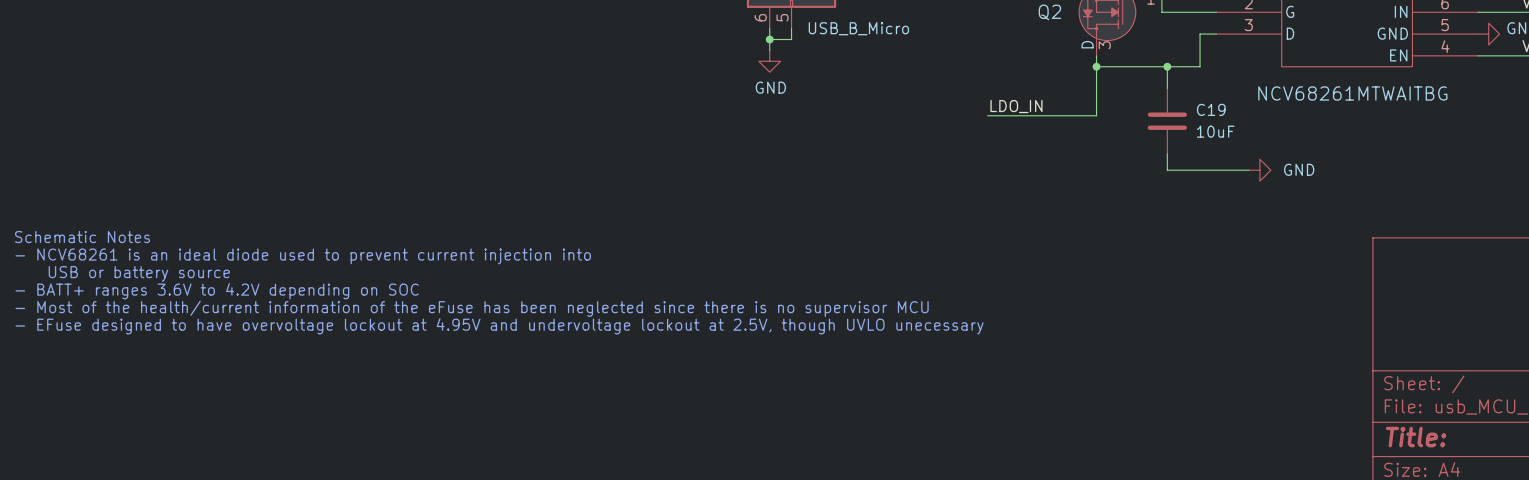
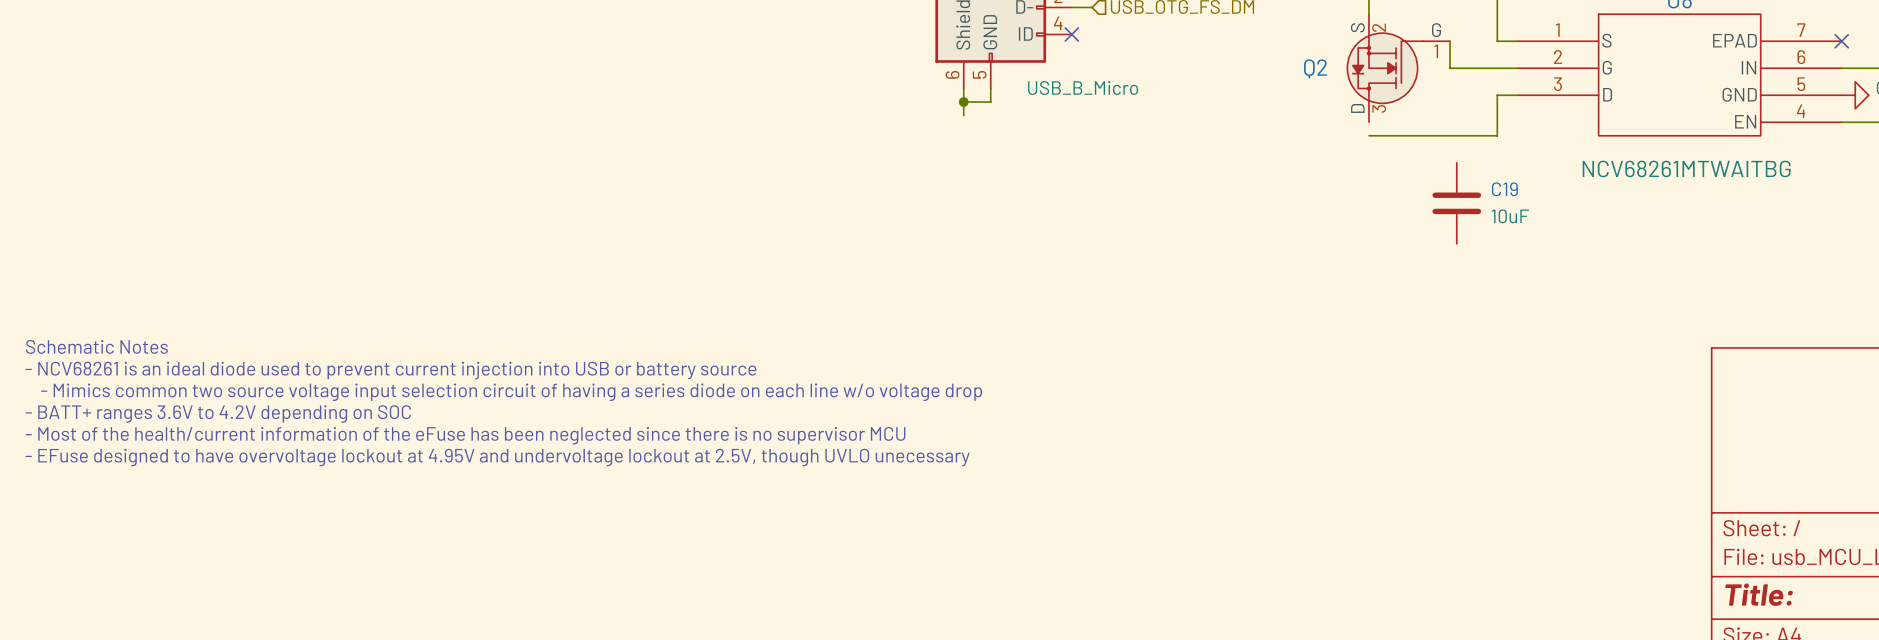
wire: (1096, 55) (1096, 115) (987, 115) -> none
power symbol: GND (769, 61) -> none
junction: (1096, 66) -> none
wire: (1167, 66) (1167, 88) -> none
junction: (1167, 66) -> none
label: LDO_IN (1016, 106) -> none
wire: (1167, 153) (1167, 170) (1249, 170) -> none
power symbol: GND (1259, 170) -> none
text: - NCV68261 is an ideal diode used to prevent current injection into (303, 256) -> - NCV68261 is an ideal diode used to prevent current injection into USB or battery source (391, 370)
text: USB or battery source (139, 273) -> - Mimics common two source voltage input selection circuit of having a series diode on each line w/o voltage drop (511, 392)

